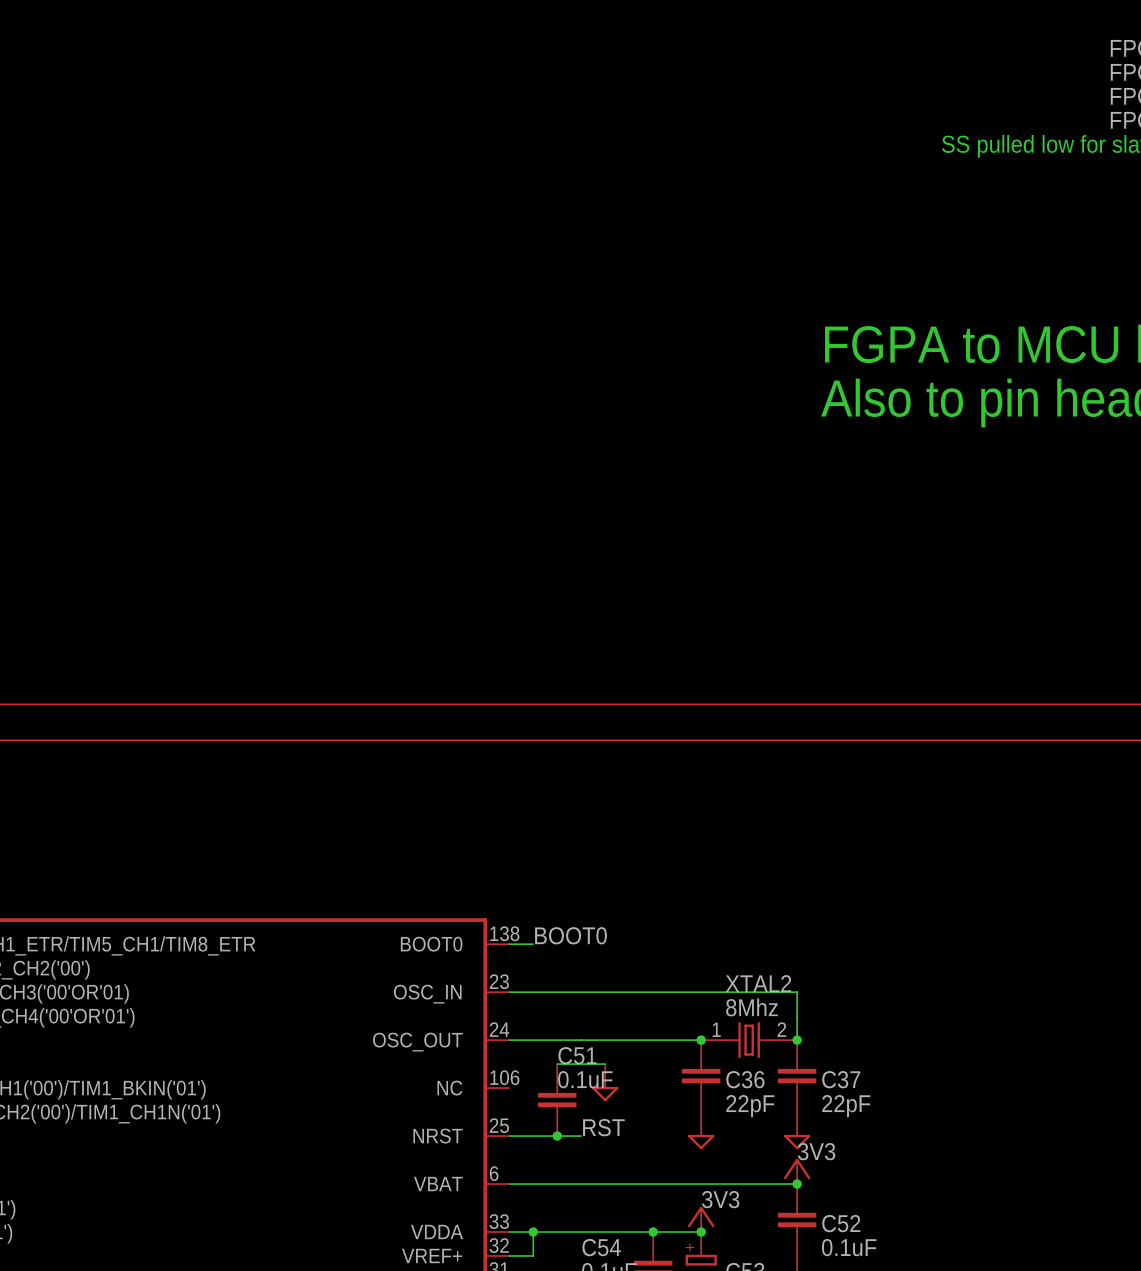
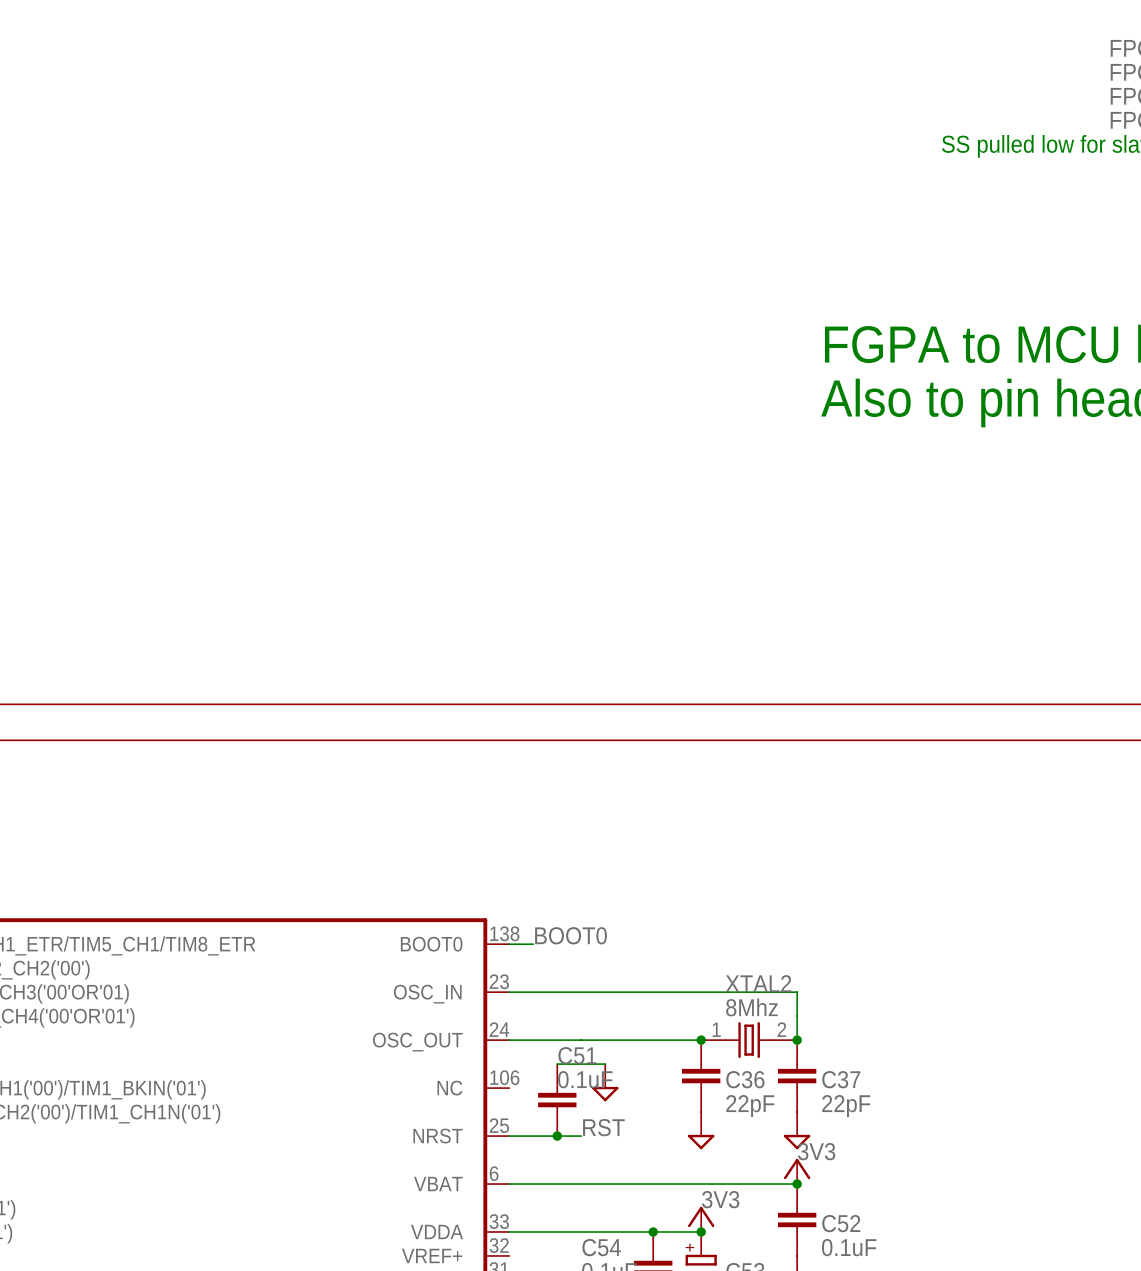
wire: (533, 1231) (533, 1255) (509, 1255) -> none
junction: (533, 1231) -> none

